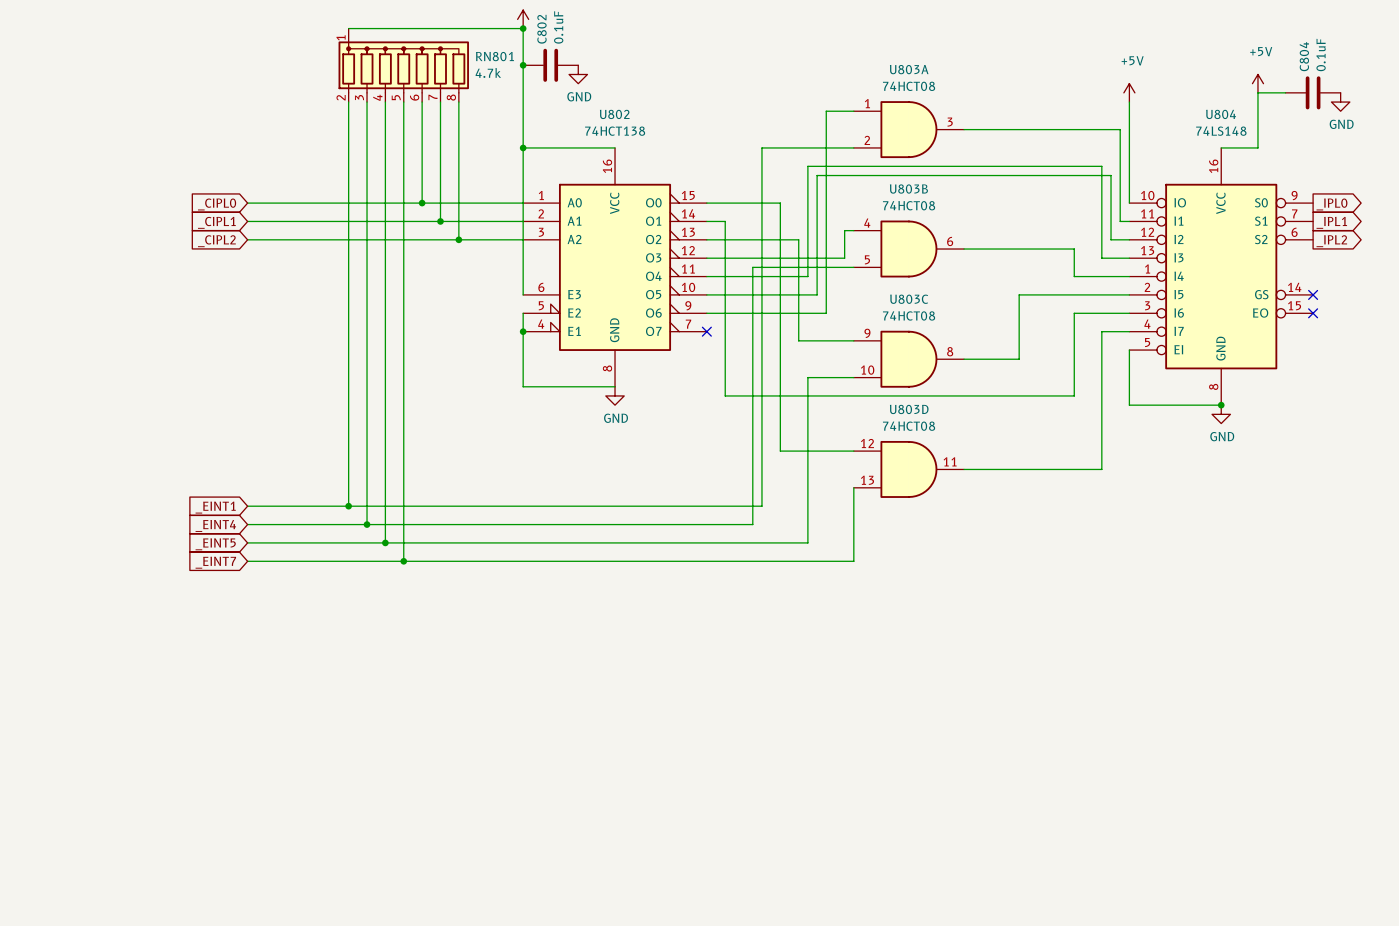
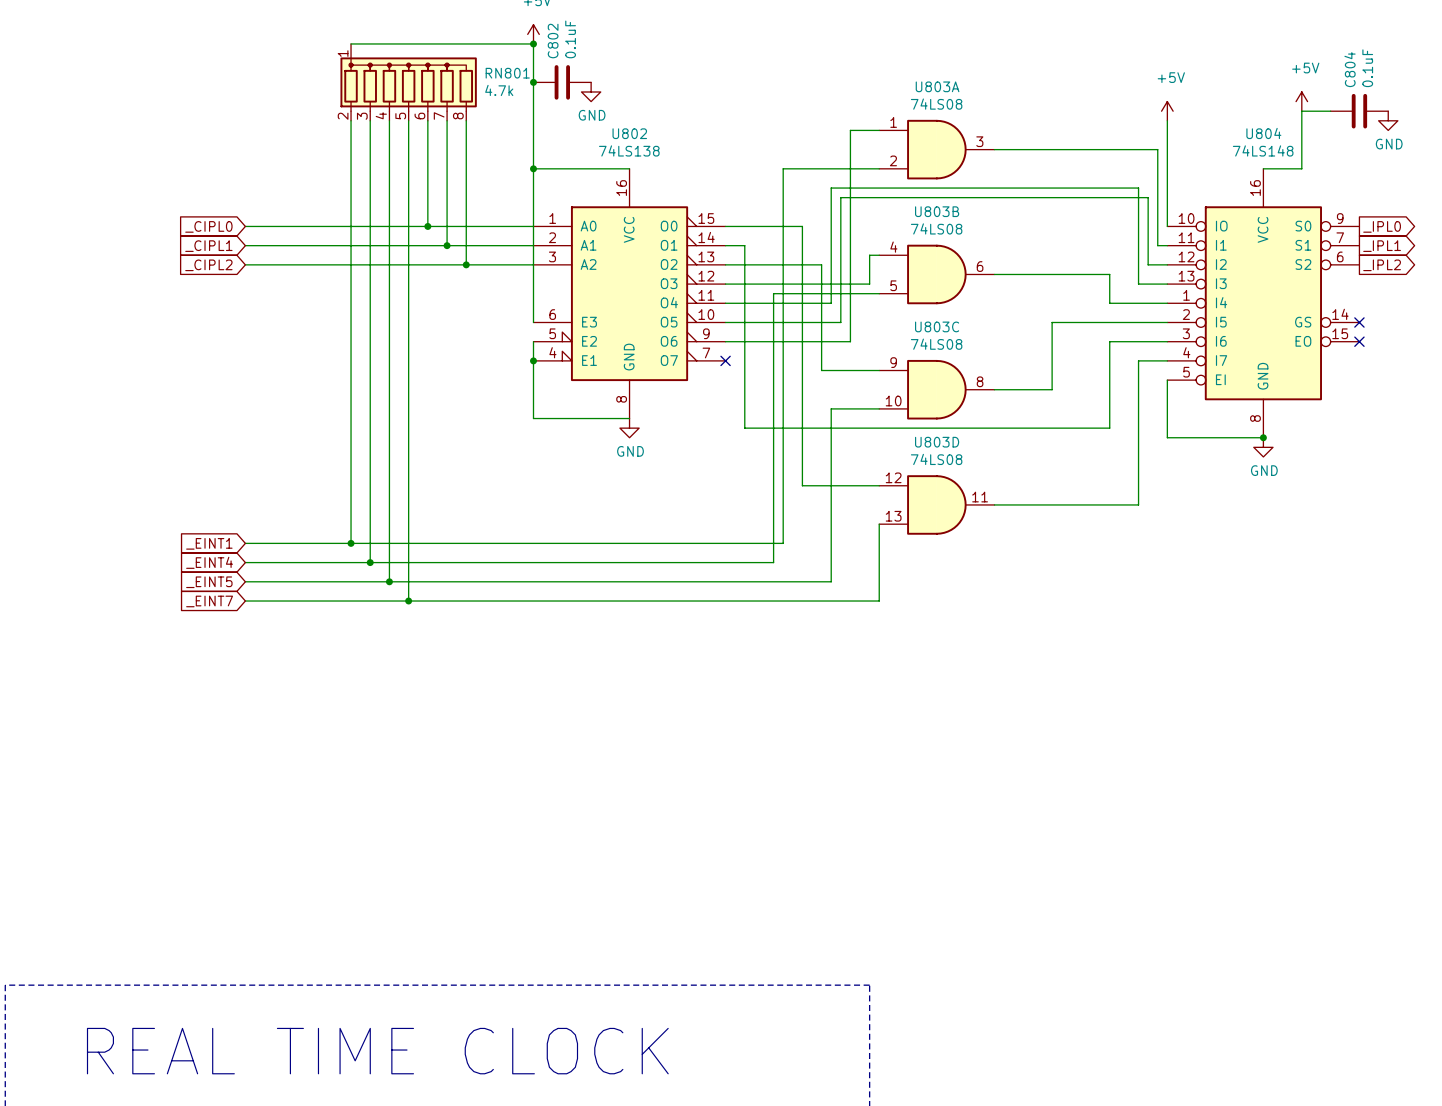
U803A value: 74HCT08 (909, 86) -> 74LS08 (936, 104)
U802 value: 74HCT138 (615, 131) -> 74LS138 (629, 150)
U803B value: 74HCT08 (909, 205) -> 74LS08 (936, 228)
U803C value: 74HCT08 (909, 315) -> 74LS08 (936, 344)
U803D value: 74HCT08 (909, 426) -> 74LS08 (936, 459)

